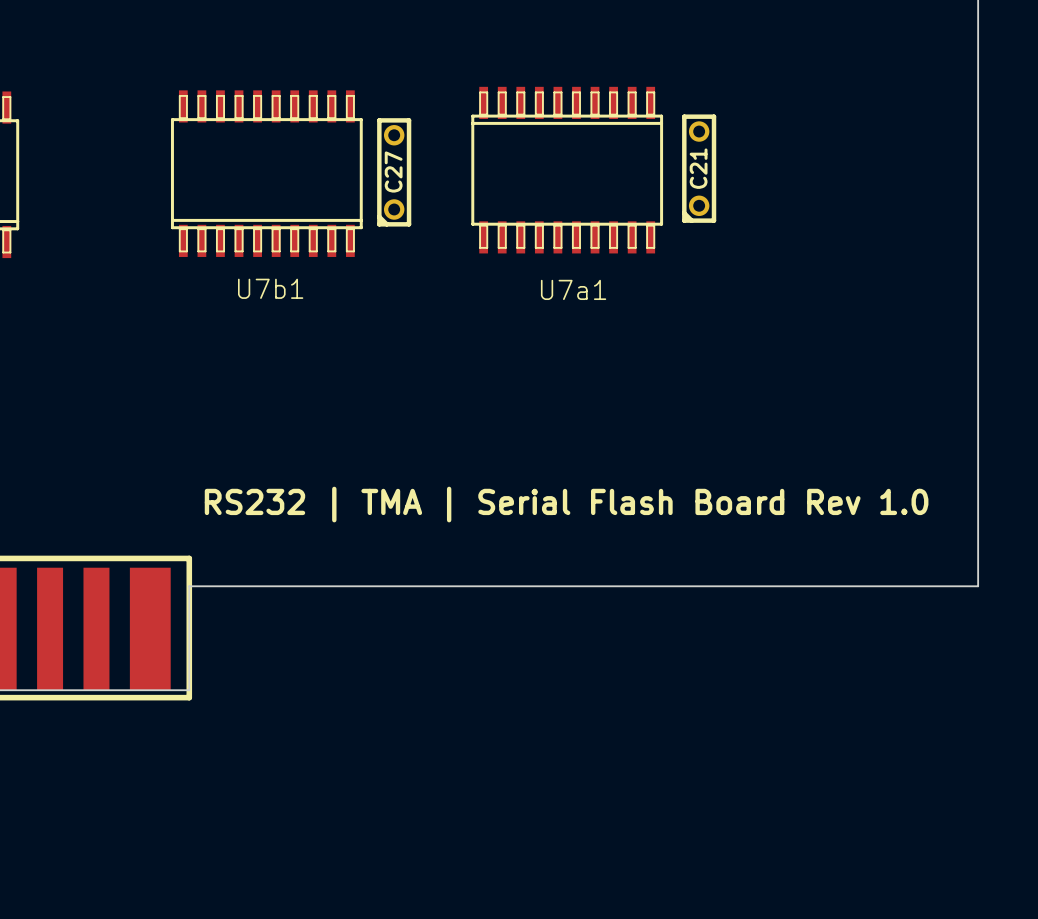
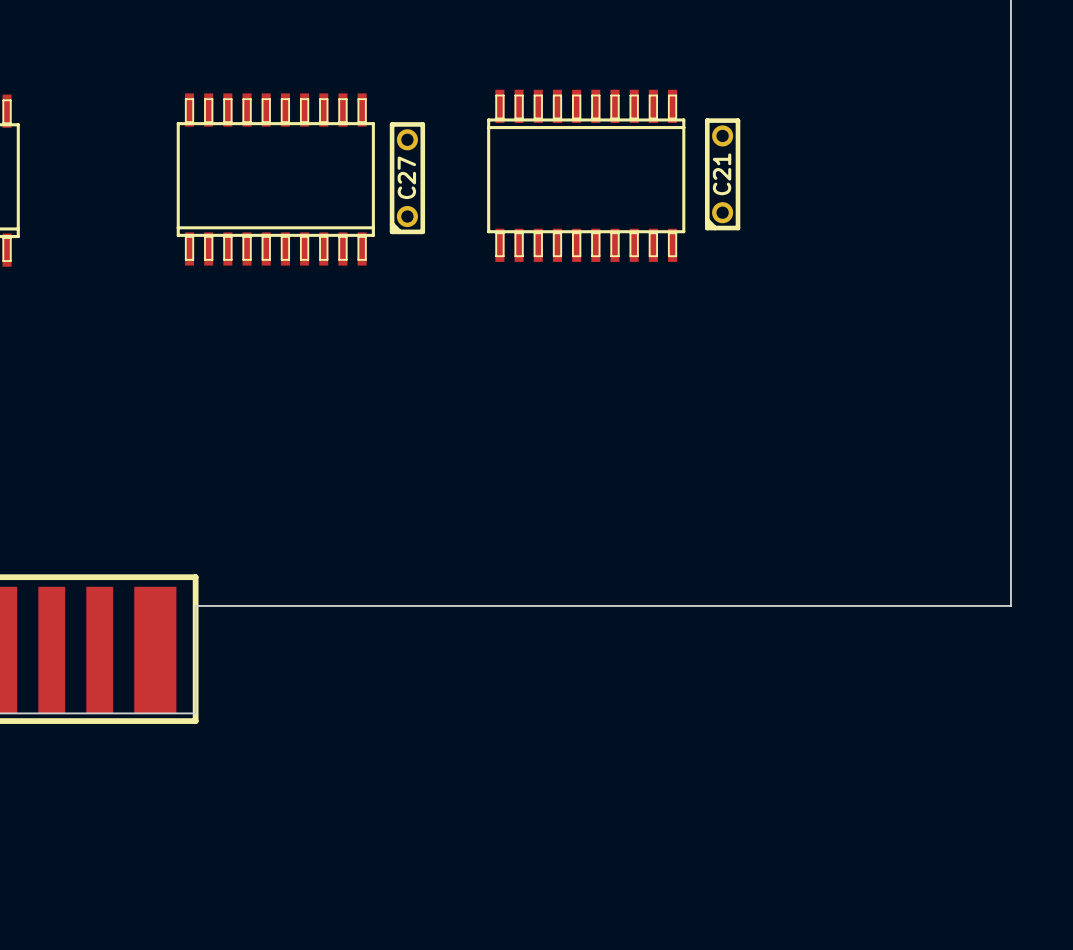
text: U7b1 (270, 288) -> none
text: U7a1 (573, 289) -> none
text: RS232 | TMA | Serial Flash Board Rev 1.0 (566, 504) -> none

